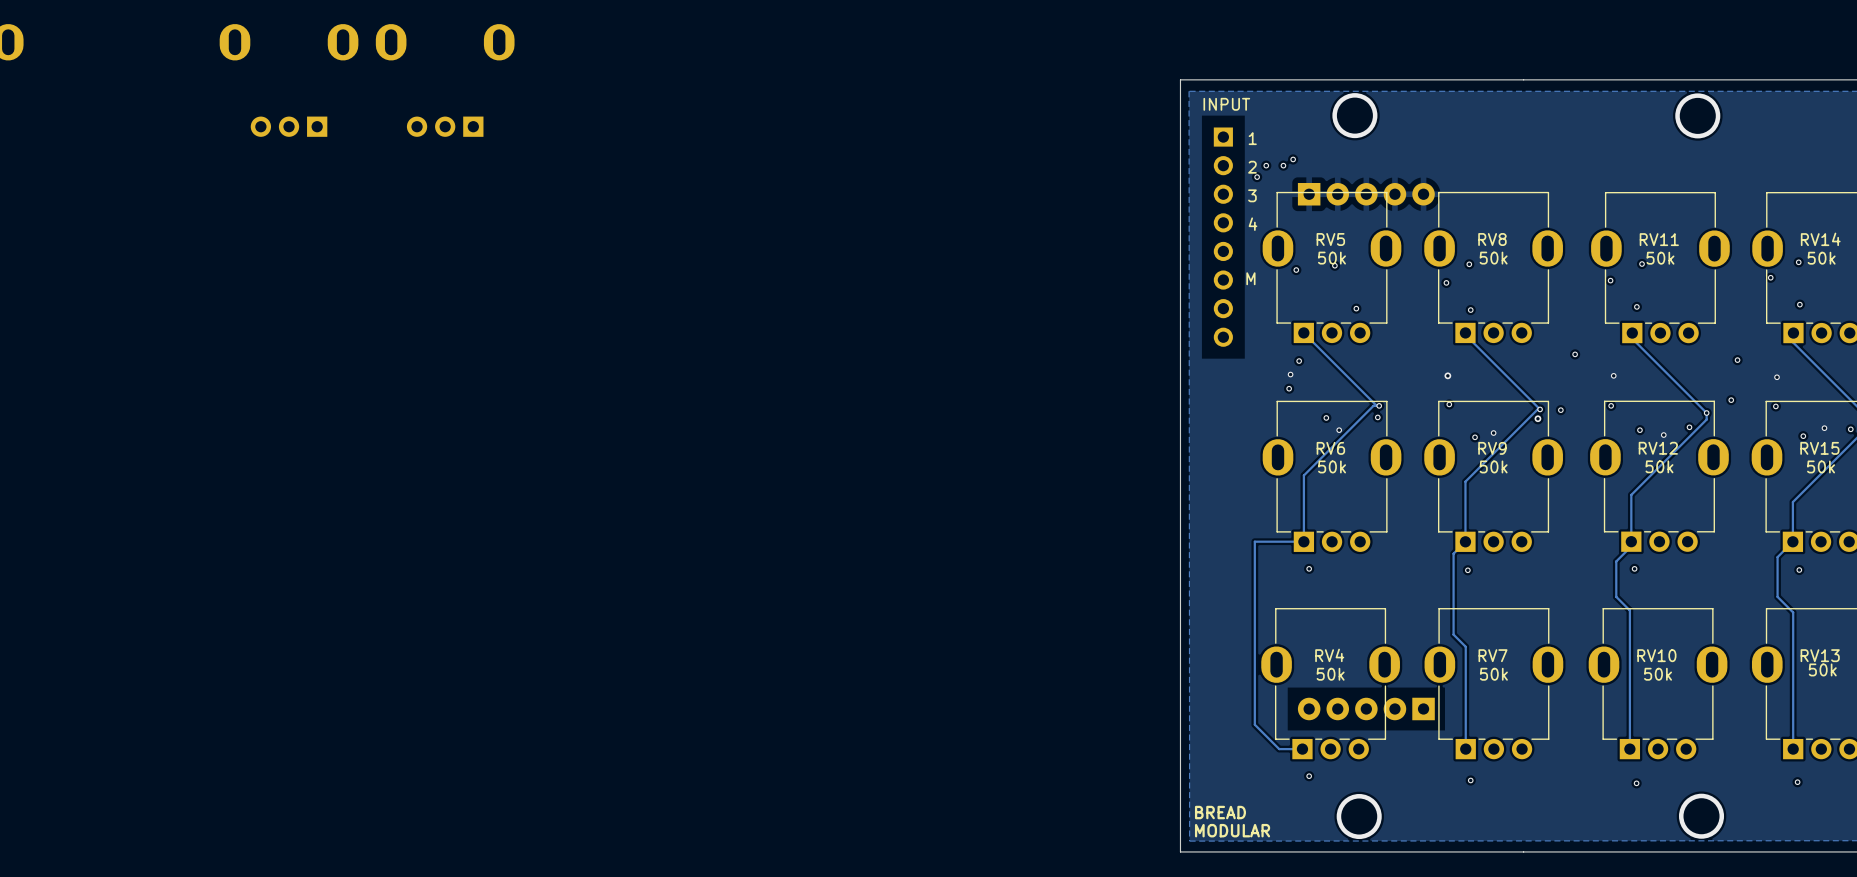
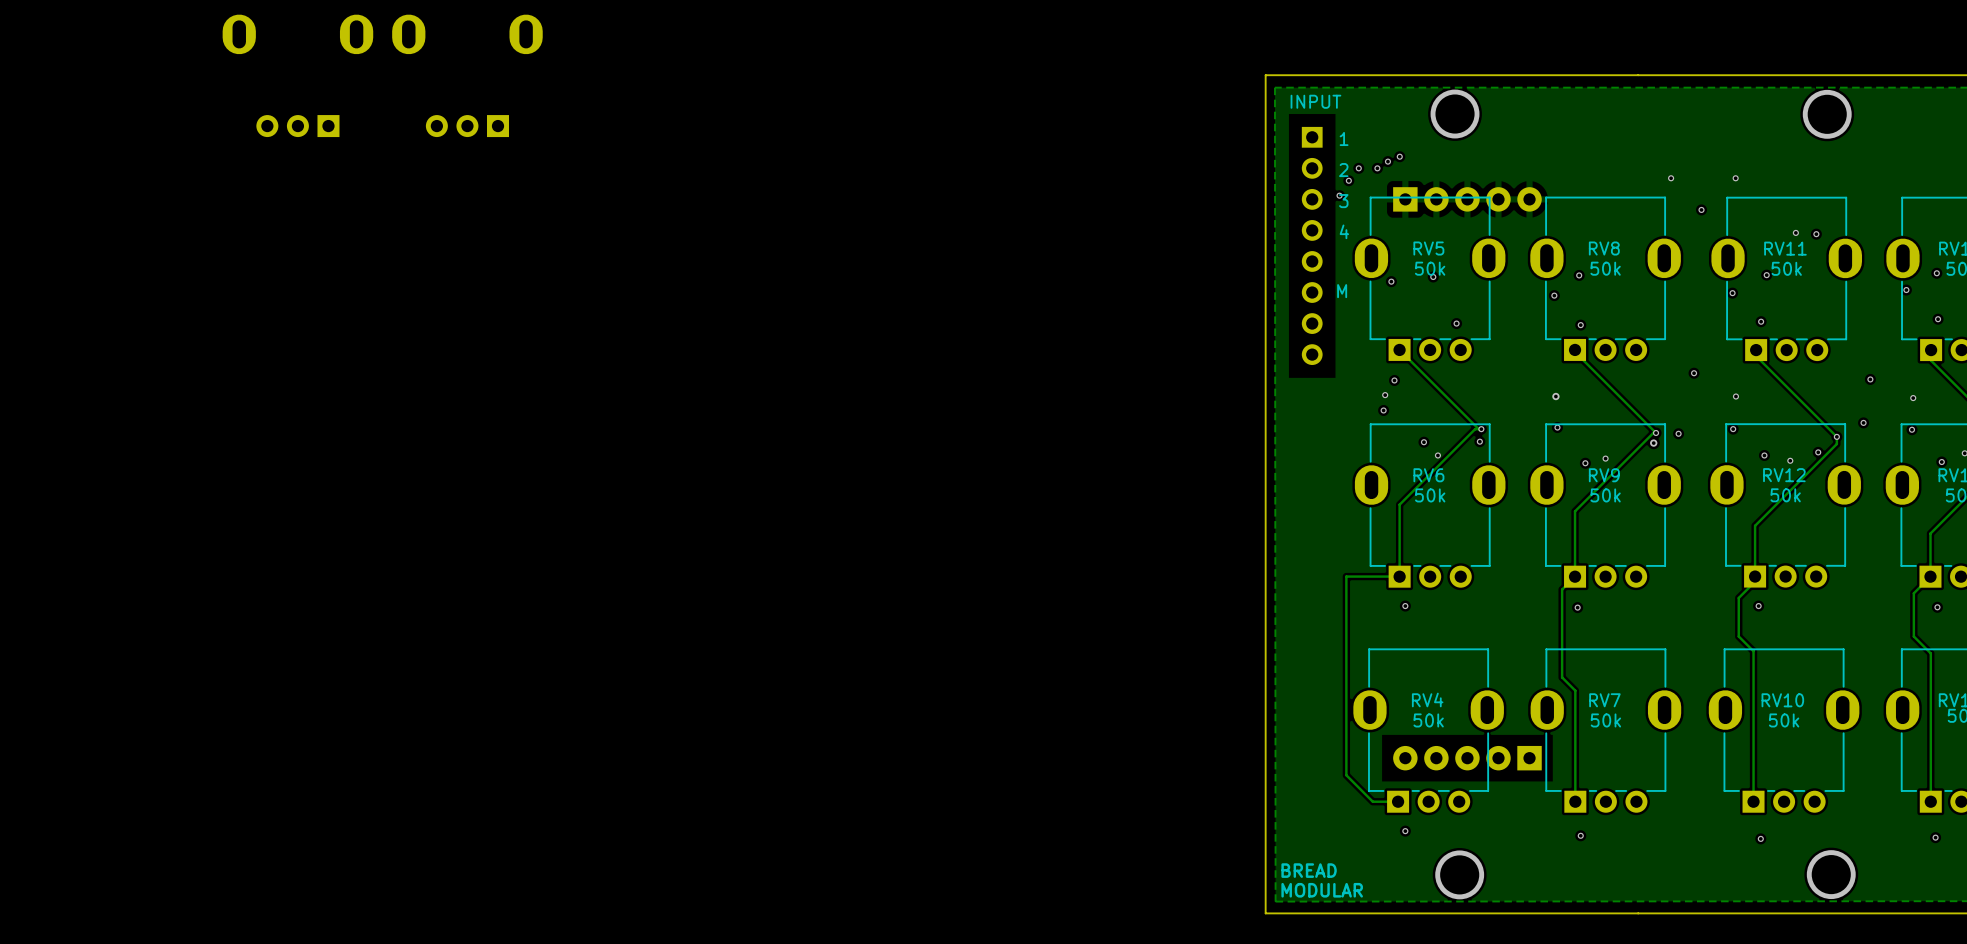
via: none -> (1399, 156)
via: none -> (1671, 178)
via: none -> (1735, 178)
via: none -> (1339, 195)
via: none -> (1701, 209)
via: none -> (1795, 232)
via: none -> (1816, 234)

